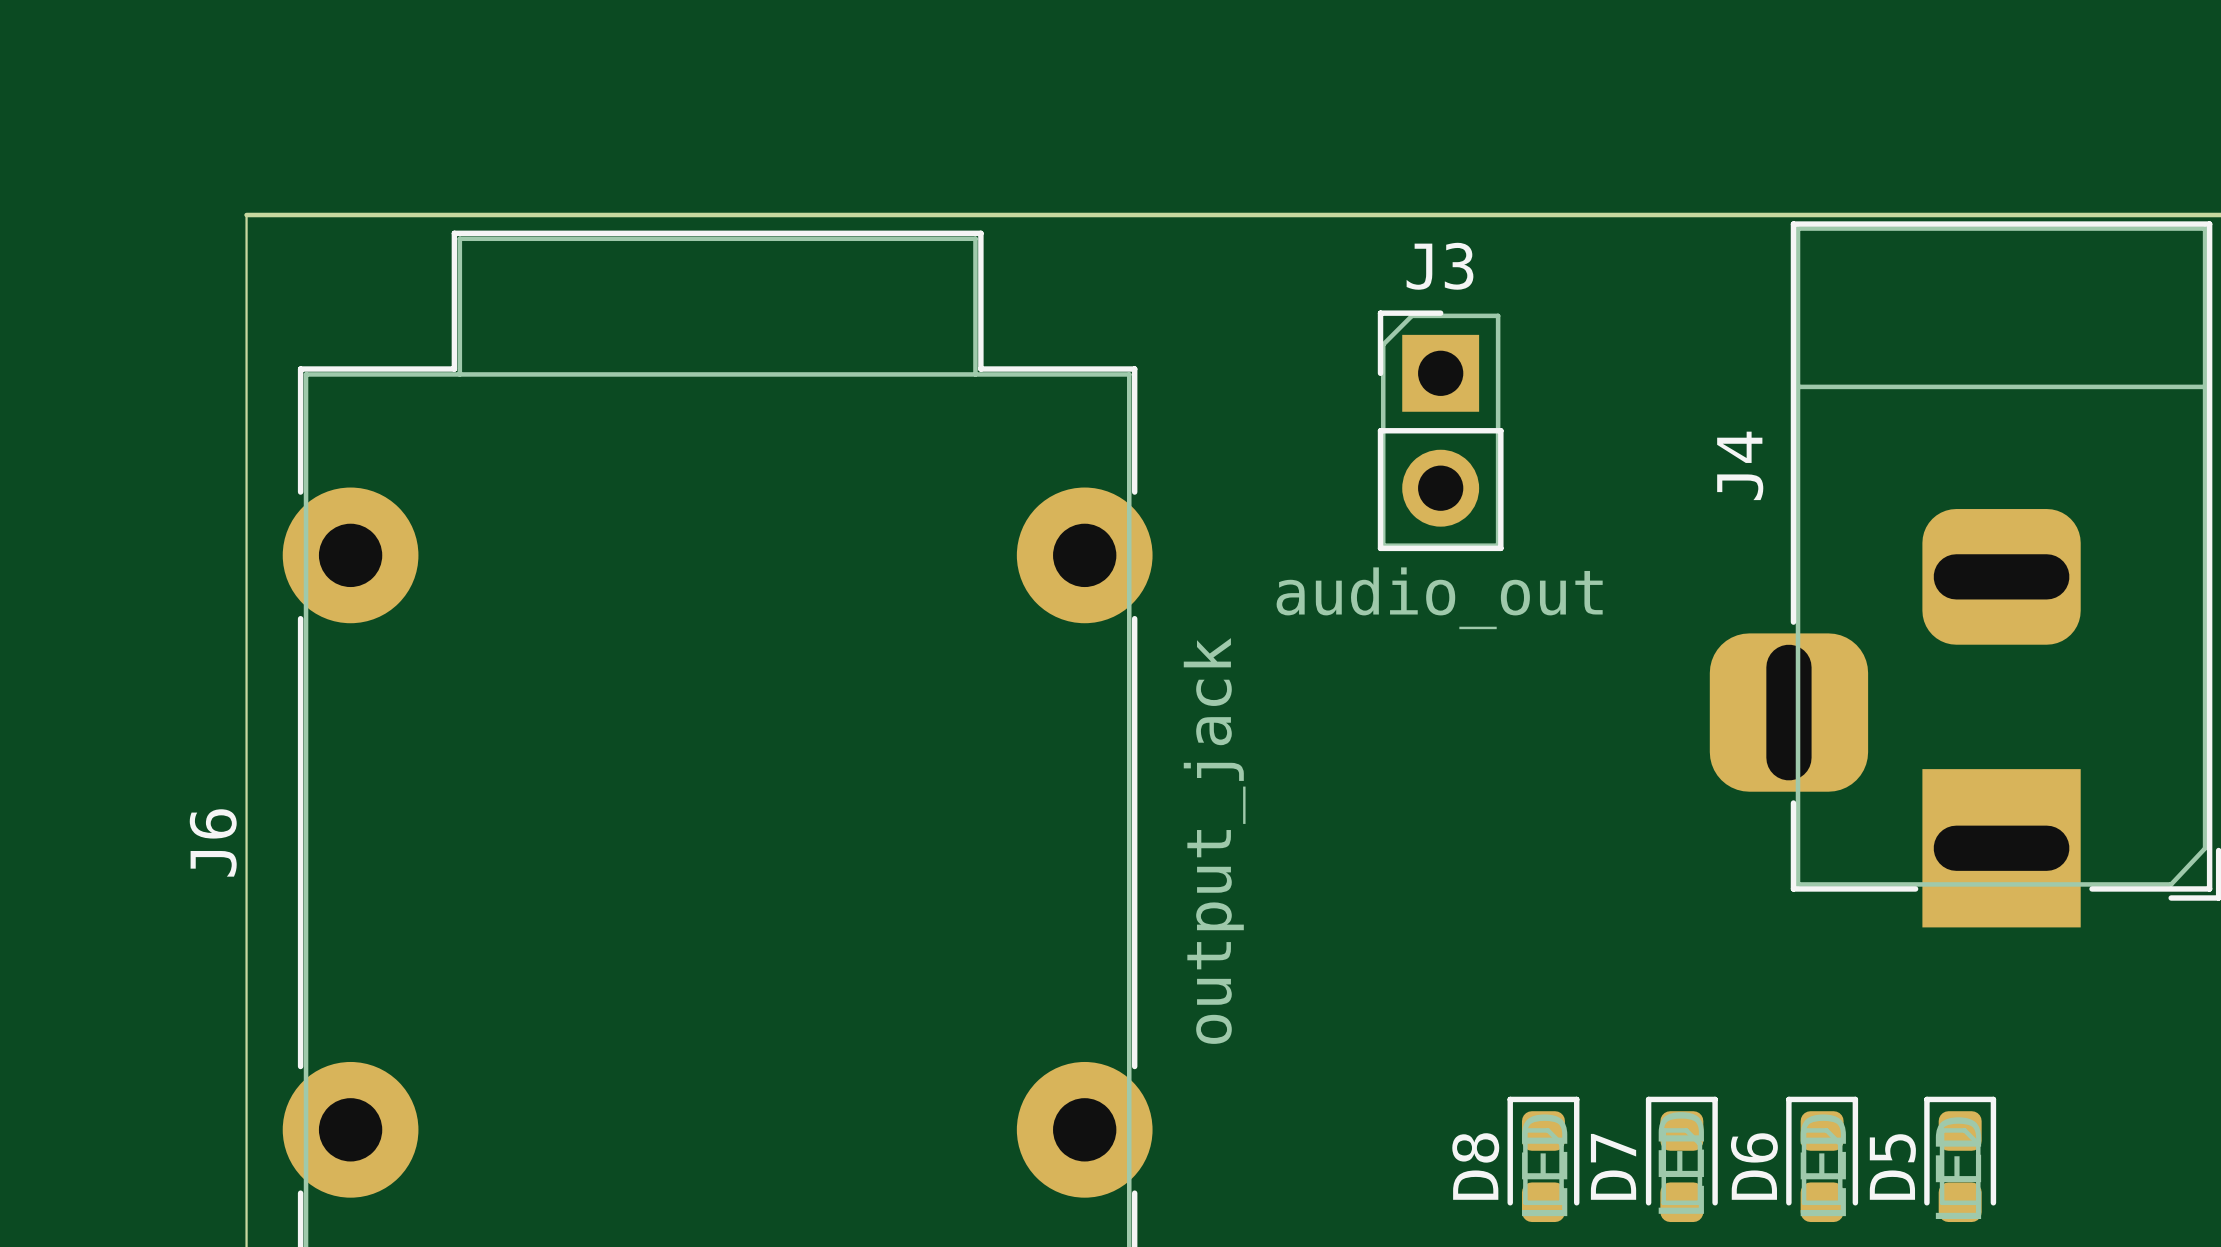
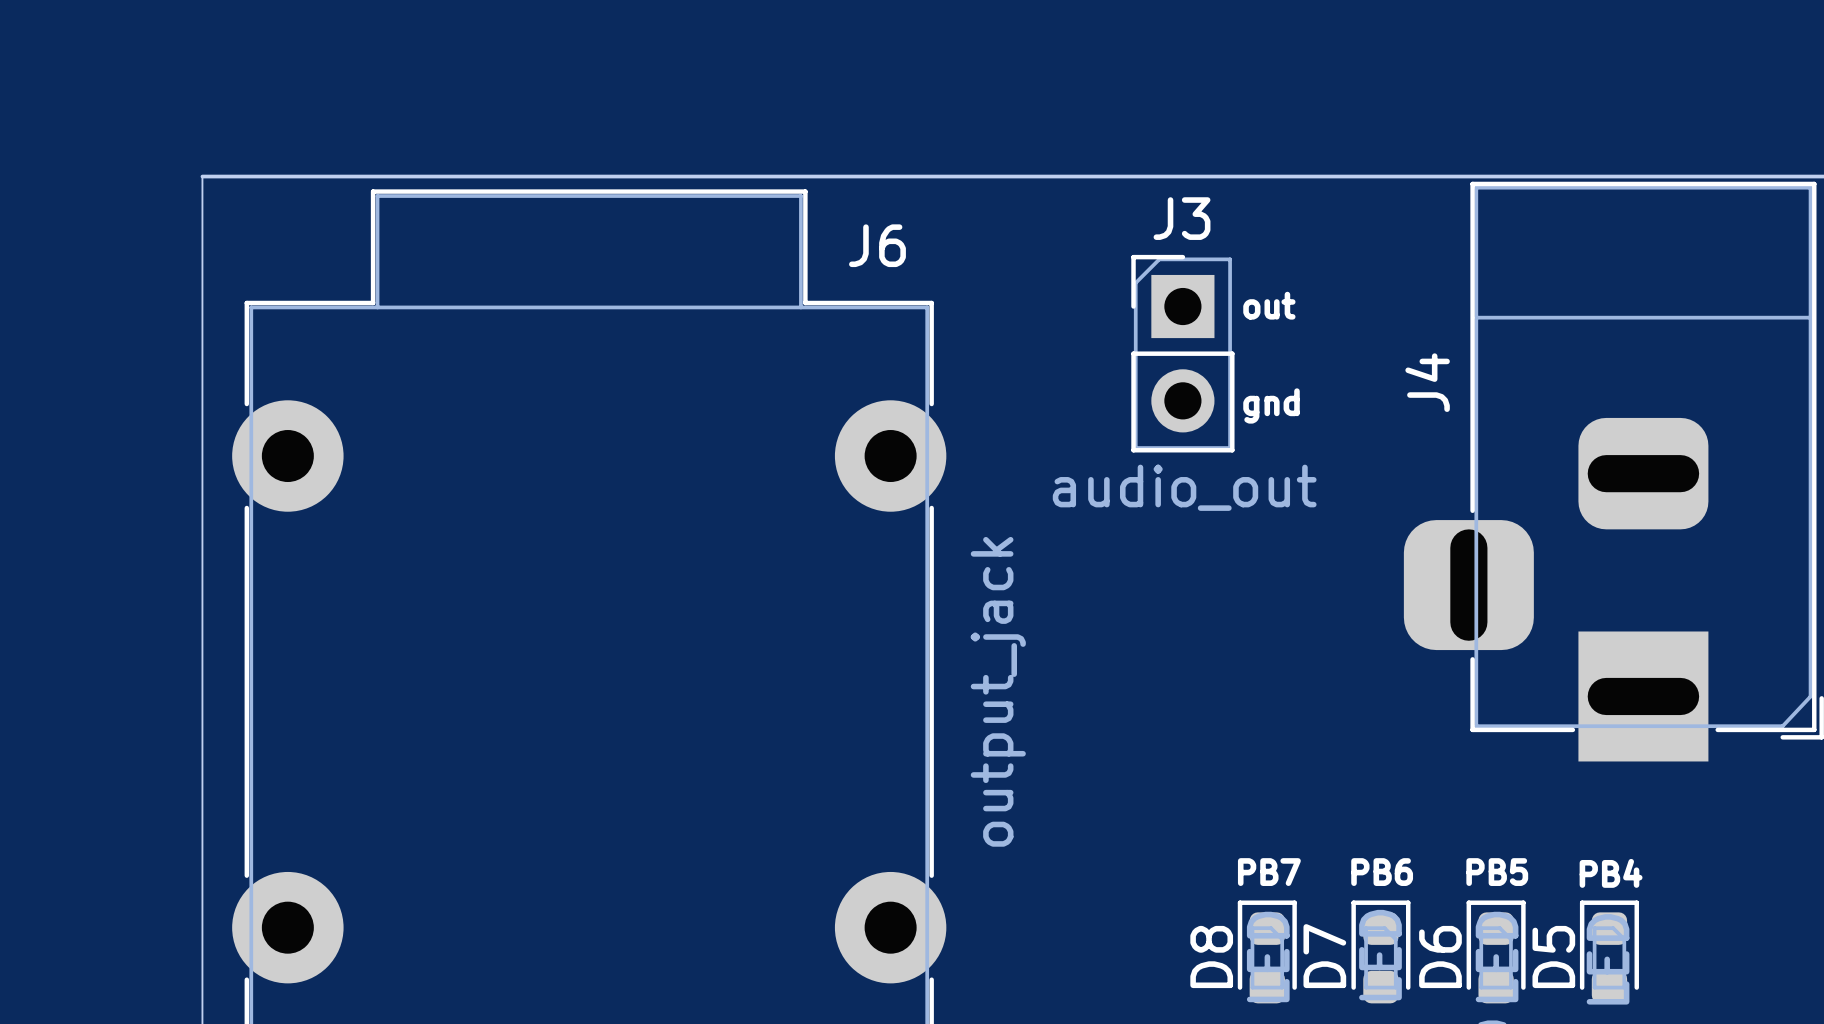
text: none -> out (1269, 305)
text: none -> gnd (1271, 405)
J6 name rotation: 0° (213, 842) -> 90° clockwise (877, 245)
J6 name position: J6 (213, 842) -> J6 (877, 245)
text: none -> PB7 (1269, 872)
text: none -> PB6 (1382, 872)
text: none -> PB5 (1497, 872)
text: none -> PB4 (1611, 873)

